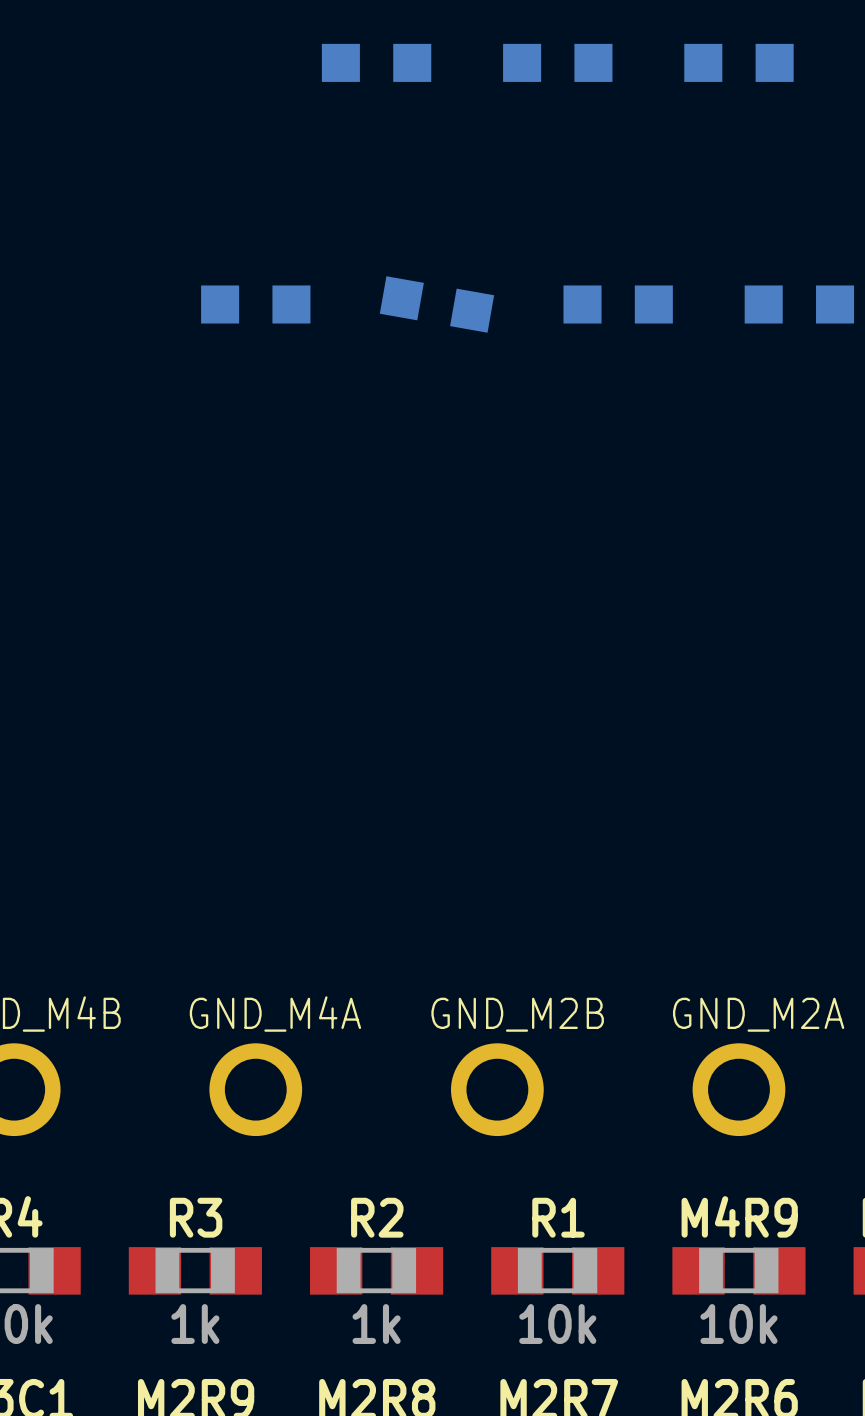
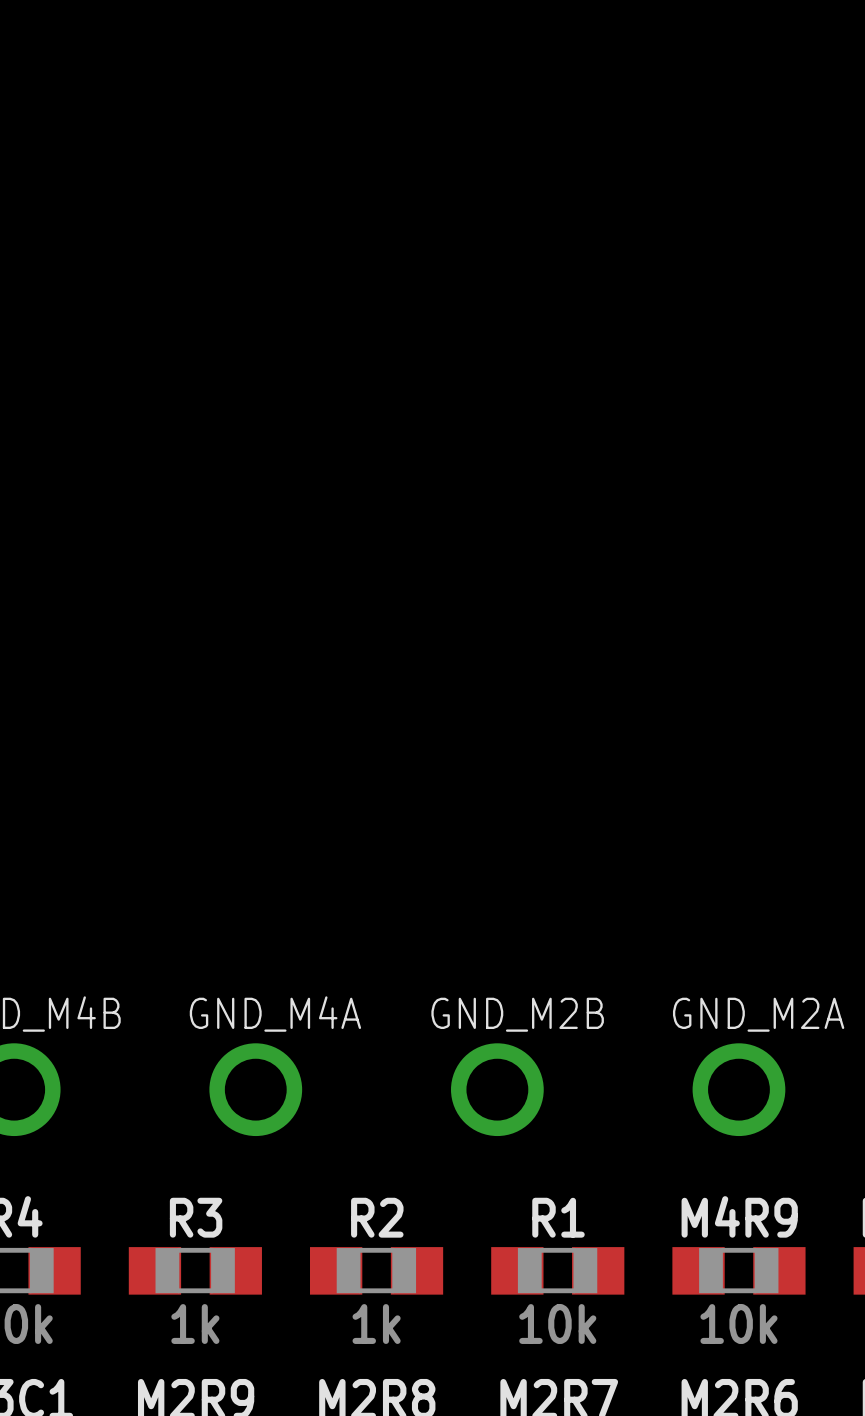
part: (376, 62) -> none
part: (557, 62) -> none
part: (738, 62) -> none
part: (255, 304) -> none
part: (436, 304) -> none
part: (618, 304) -> none
part: (799, 304) -> none

